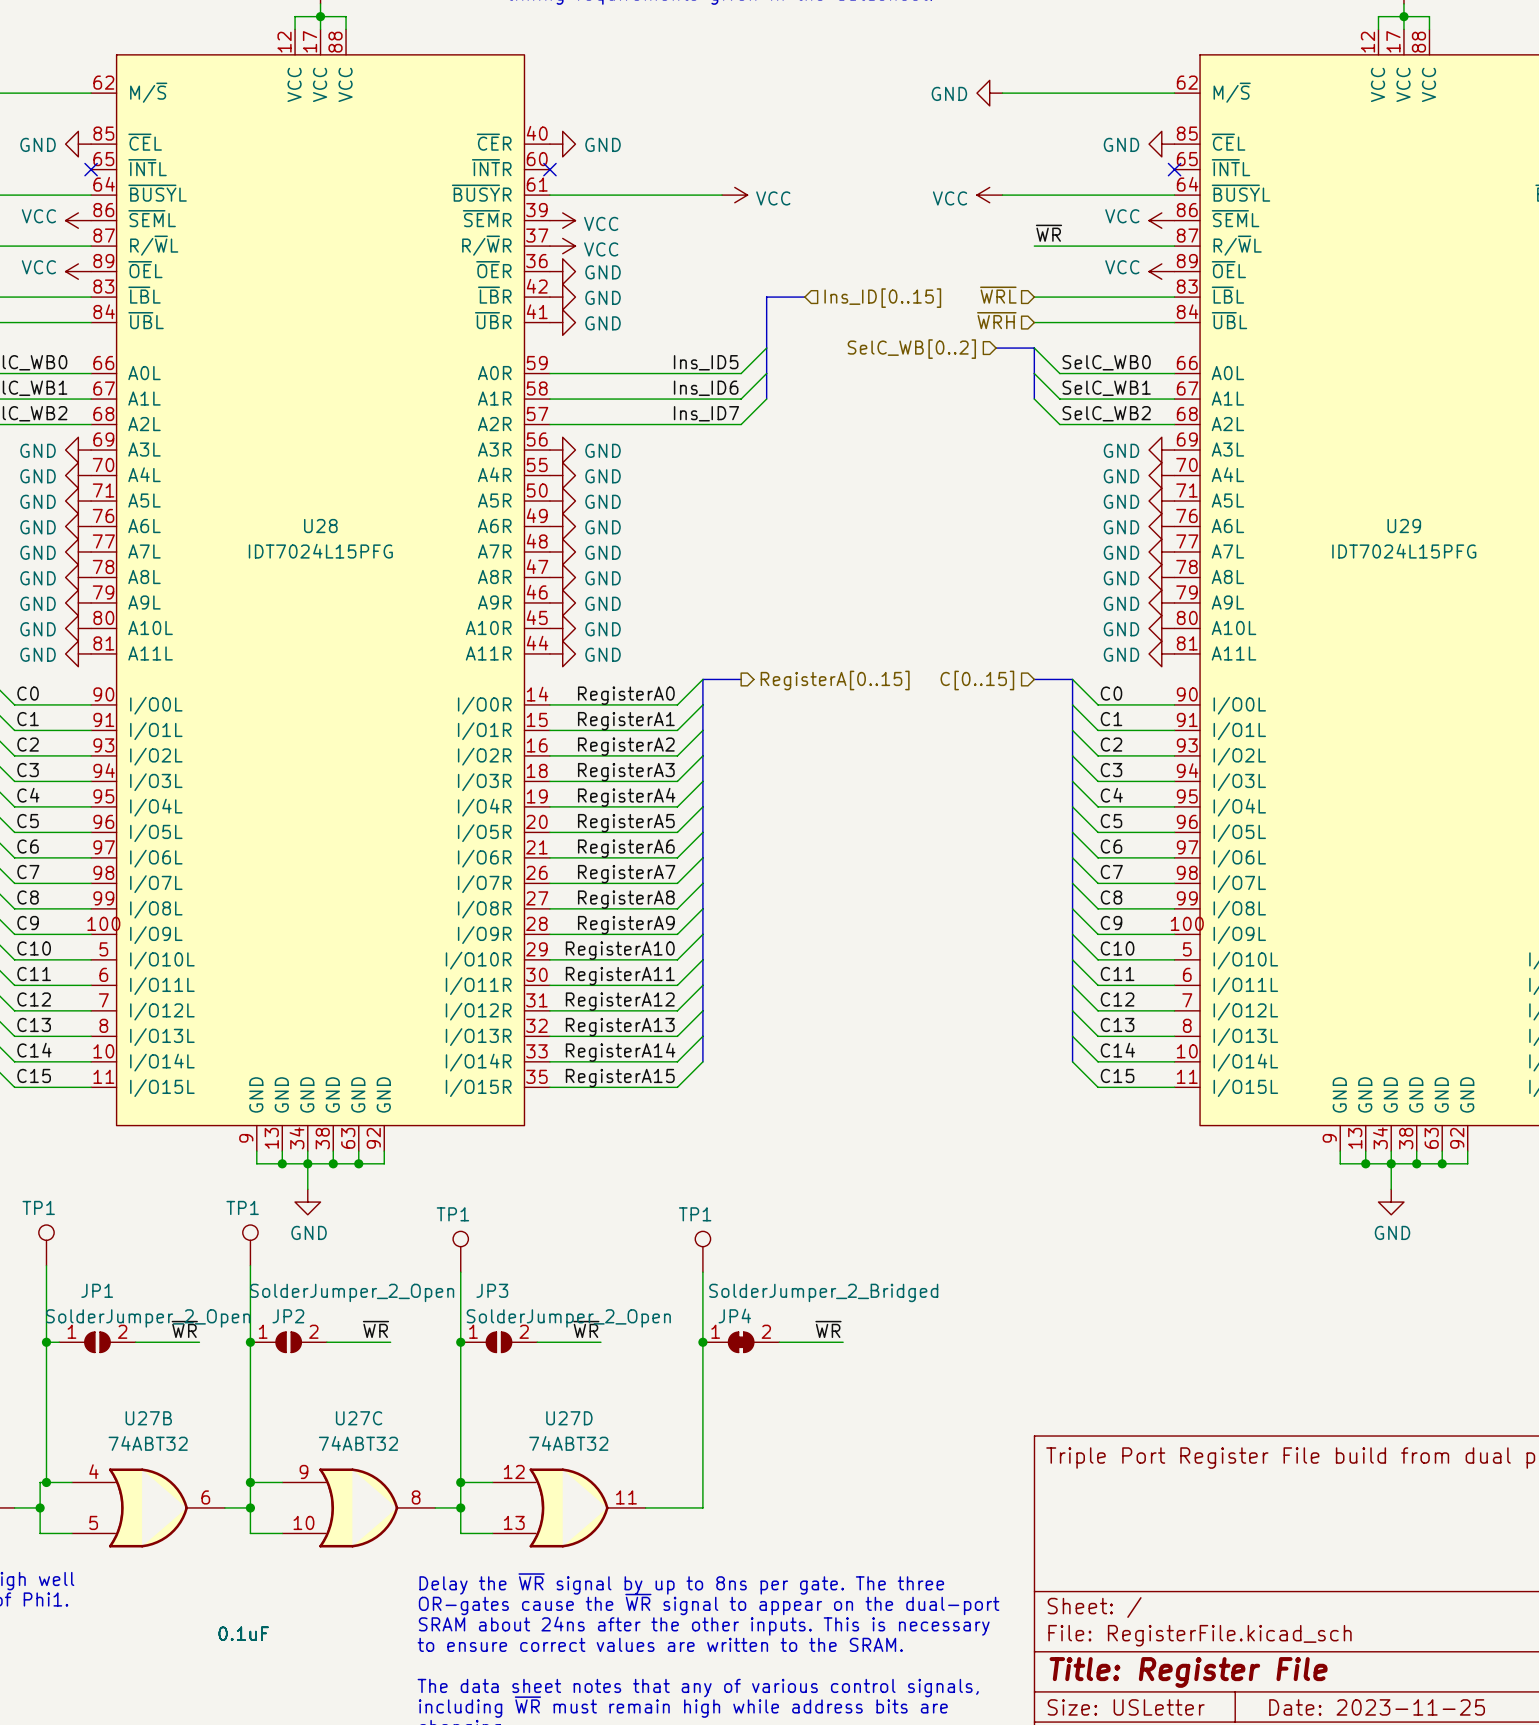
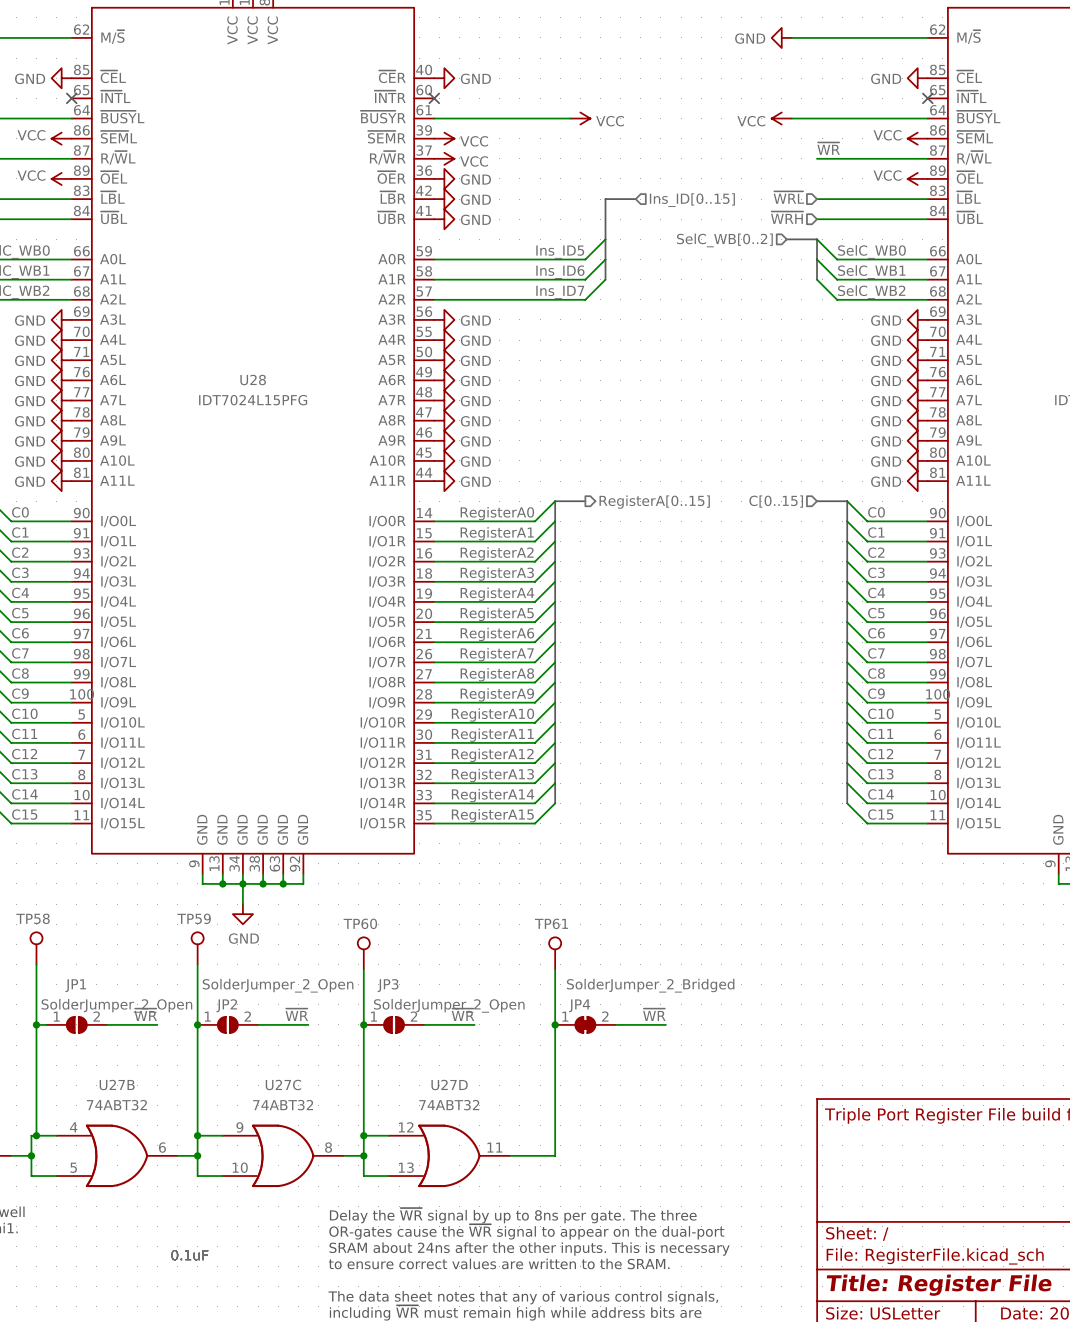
TP1 name: TP1 (38, 1207) -> TP58 (33, 918)
TP1 name: TP1 (242, 1207) -> TP59 (194, 918)
TP1 name: TP1 (452, 1214) -> TP60 (360, 923)
TP1 name: TP1 (695, 1214) -> TP61 (551, 923)

